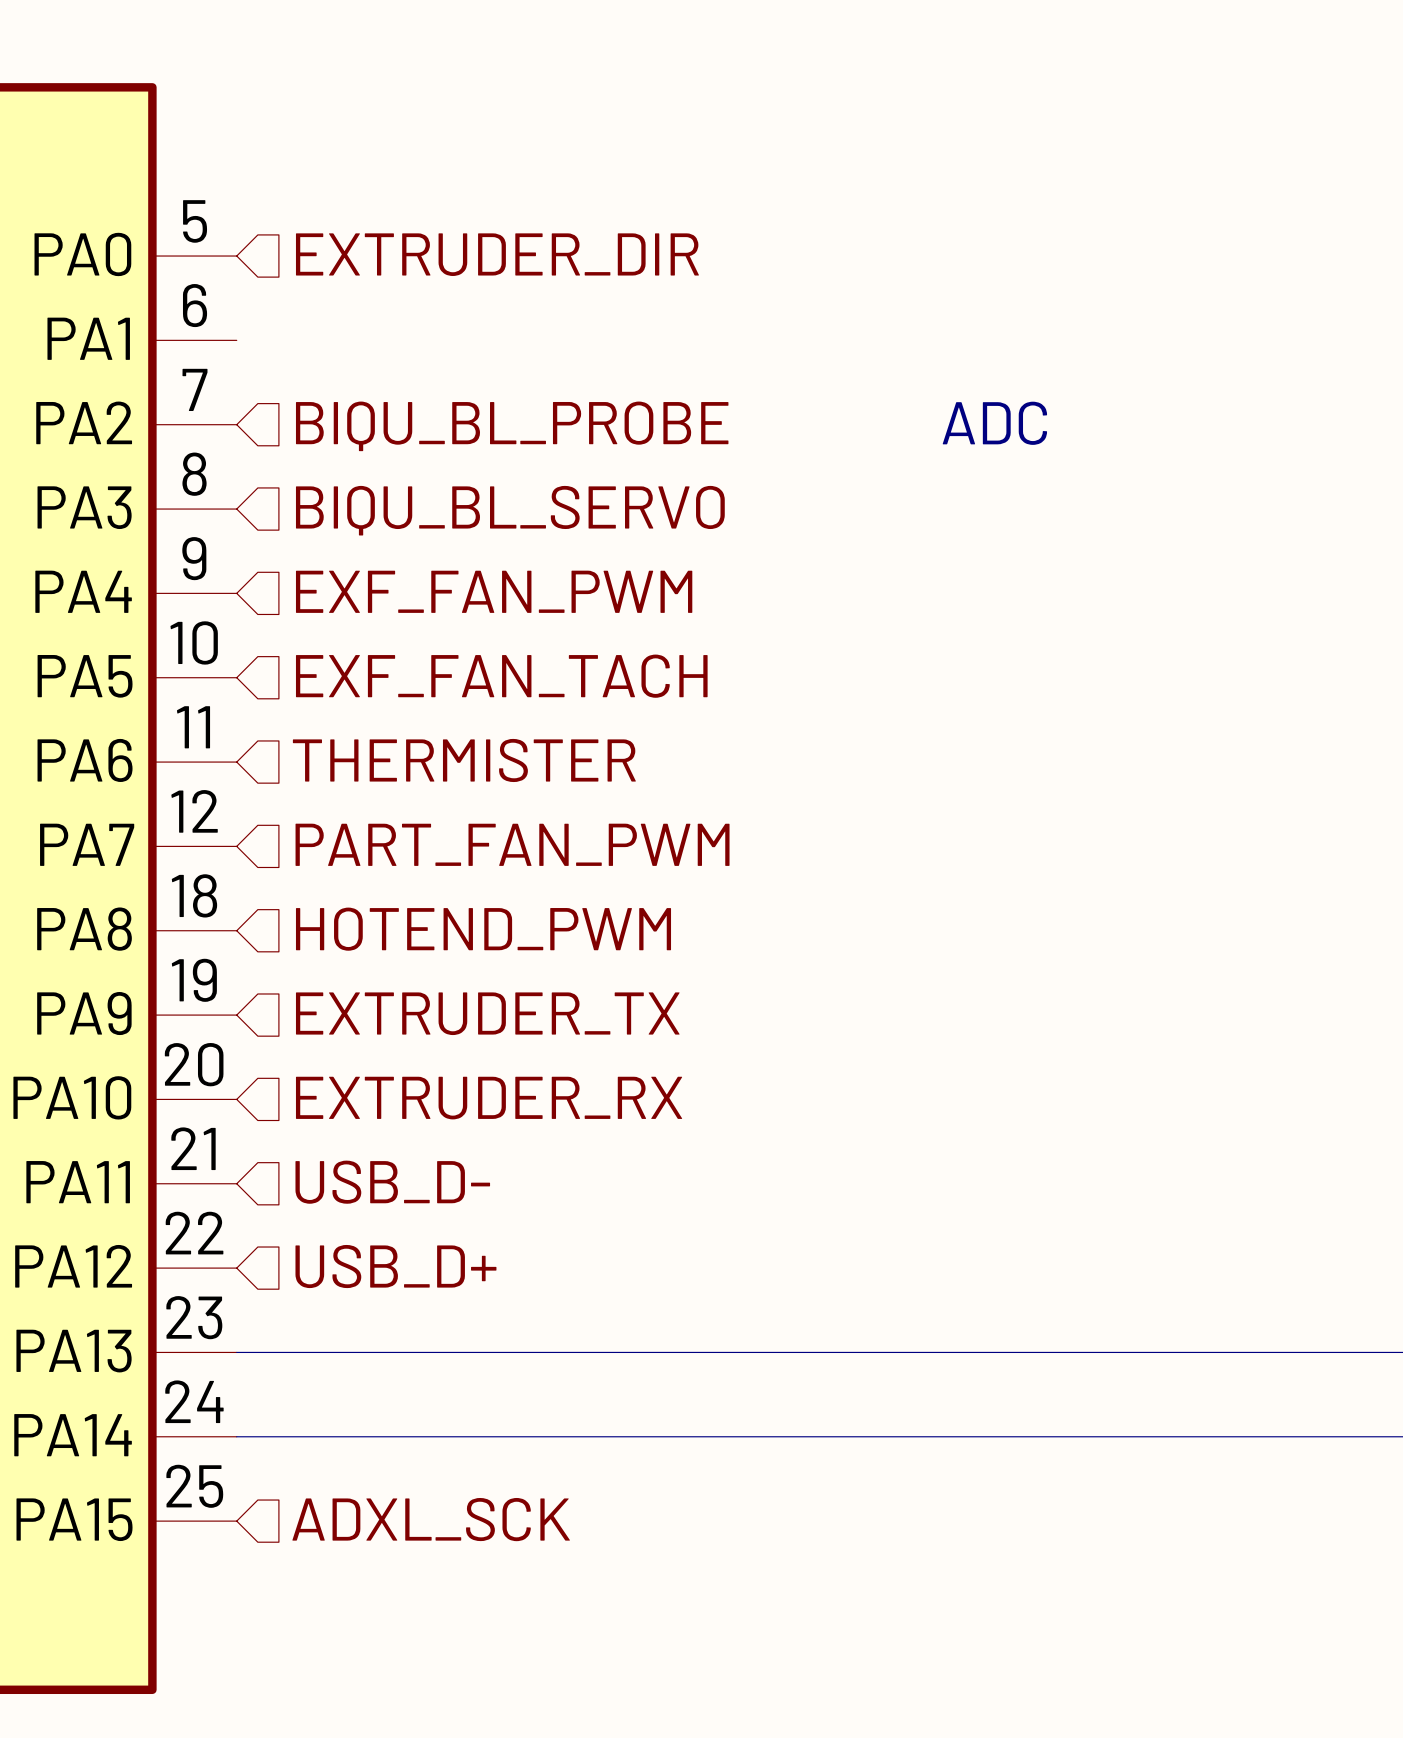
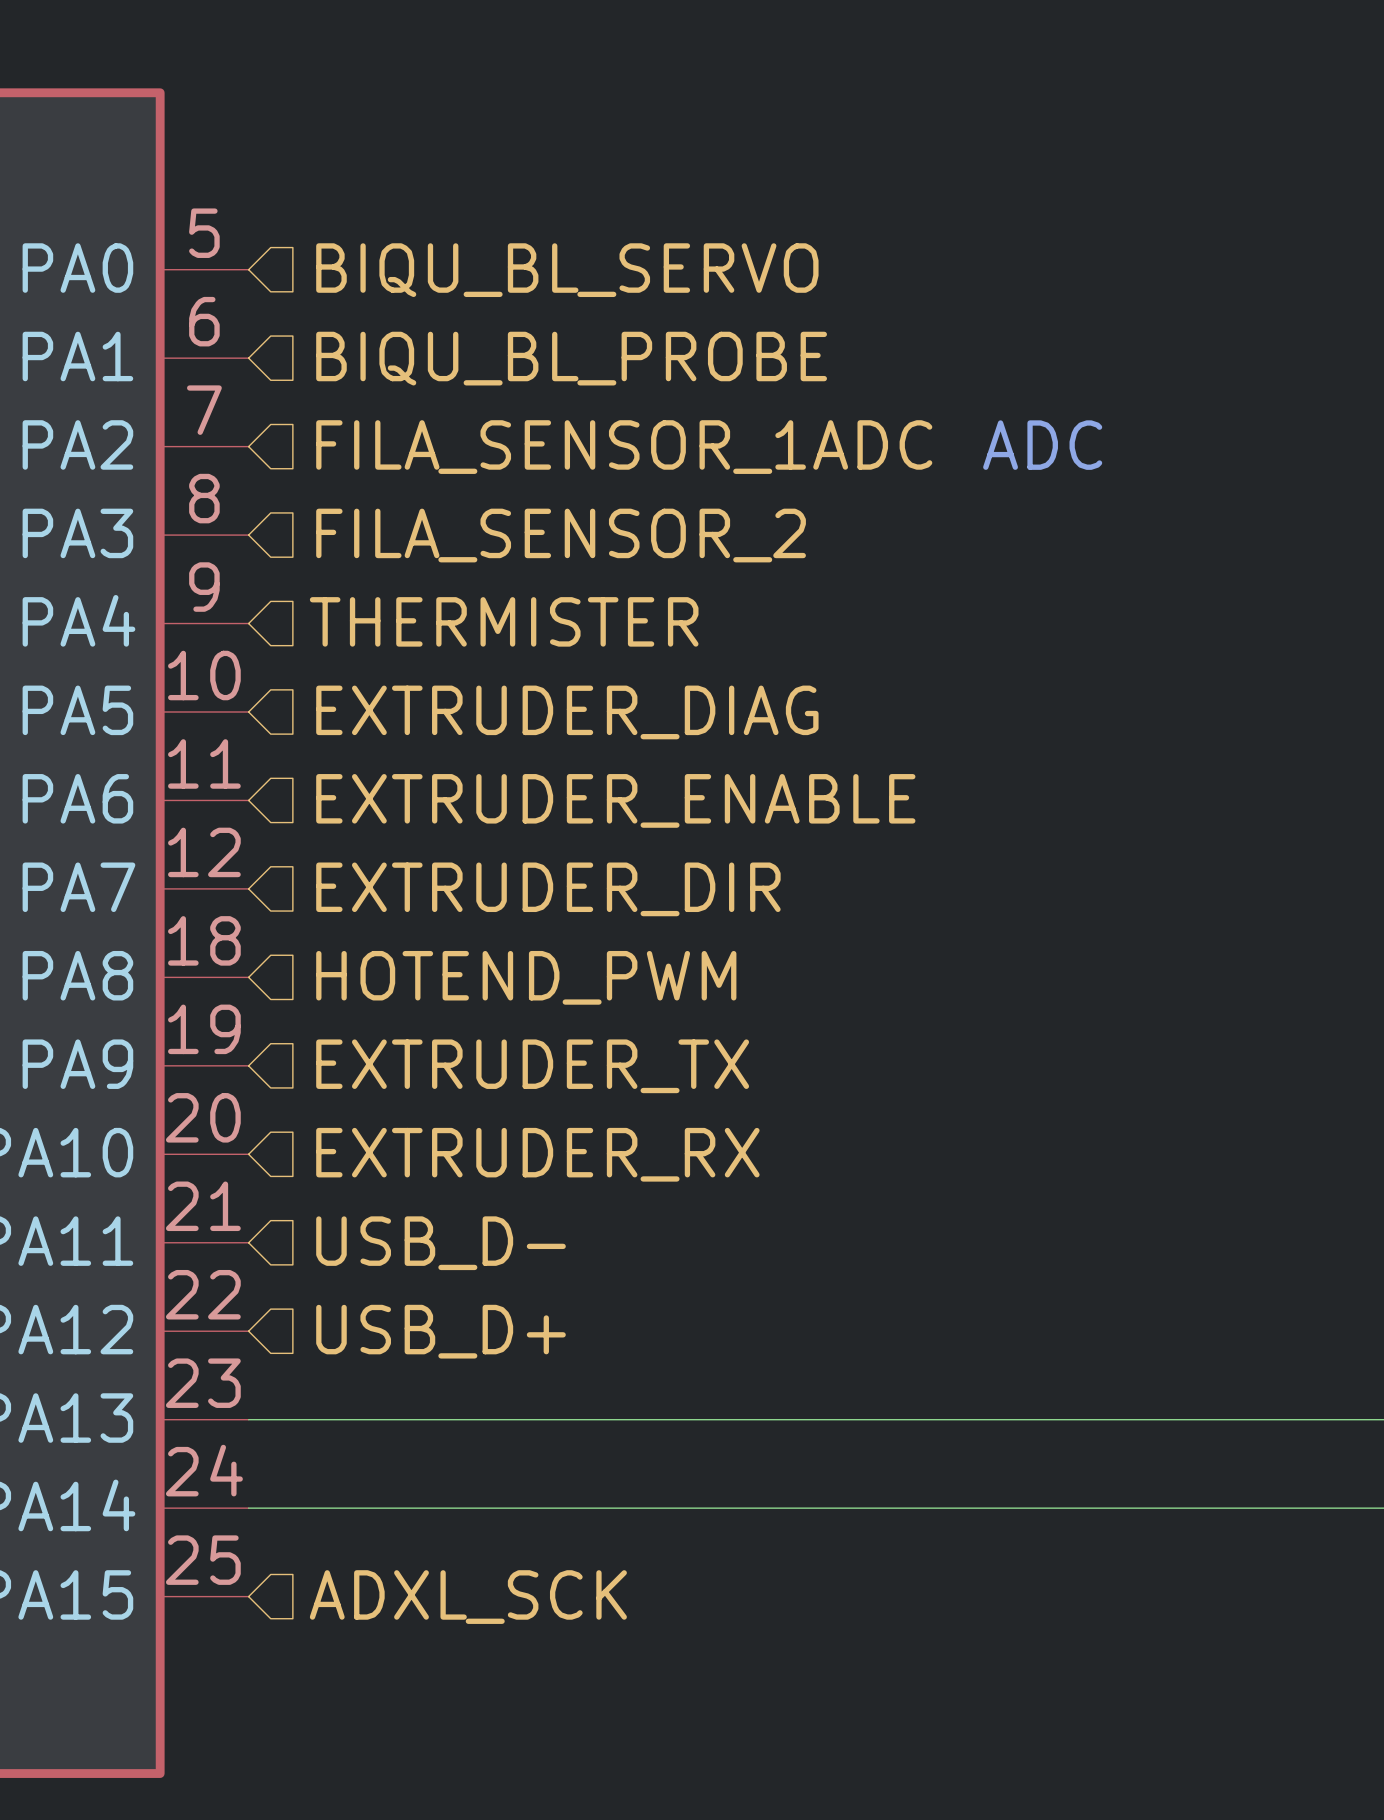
hierarchical label: EXTRUDER_DIR (497, 254) -> BIQU_BL_SERVO (567, 270)
hierarchical label: none -> BIQU_BL_PROBE (571, 358)
hierarchical label: BIQU_BL_PROBE (512, 426) -> FILA_SENSOR_1ADC (624, 447)
hierarchical label: BIQU_BL_SERVO (510, 510) -> FILA_SENSOR_2 (561, 535)
hierarchical label: EXF_FAN_PWM (494, 591) -> THERMISTER (504, 621)
hierarchical label: EXF_FAN_TACH (501, 676) -> EXTRUDER_DIAG (567, 712)
hierarchical label: THERMISTER (464, 760) -> EXTRUDER_ENABLE (615, 800)
hierarchical label: PART_FAN_PWM (512, 844) -> EXTRUDER_DIR (548, 889)

